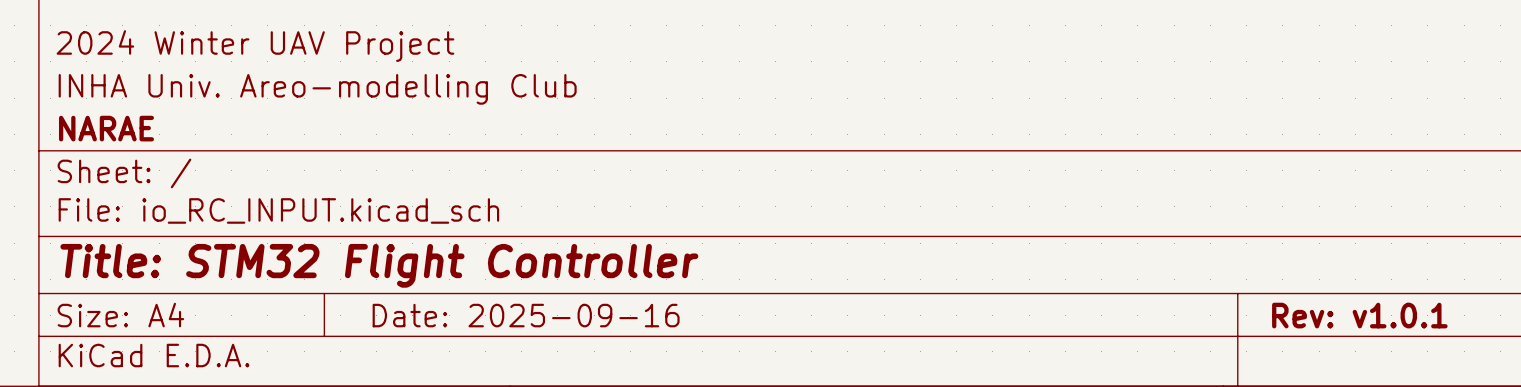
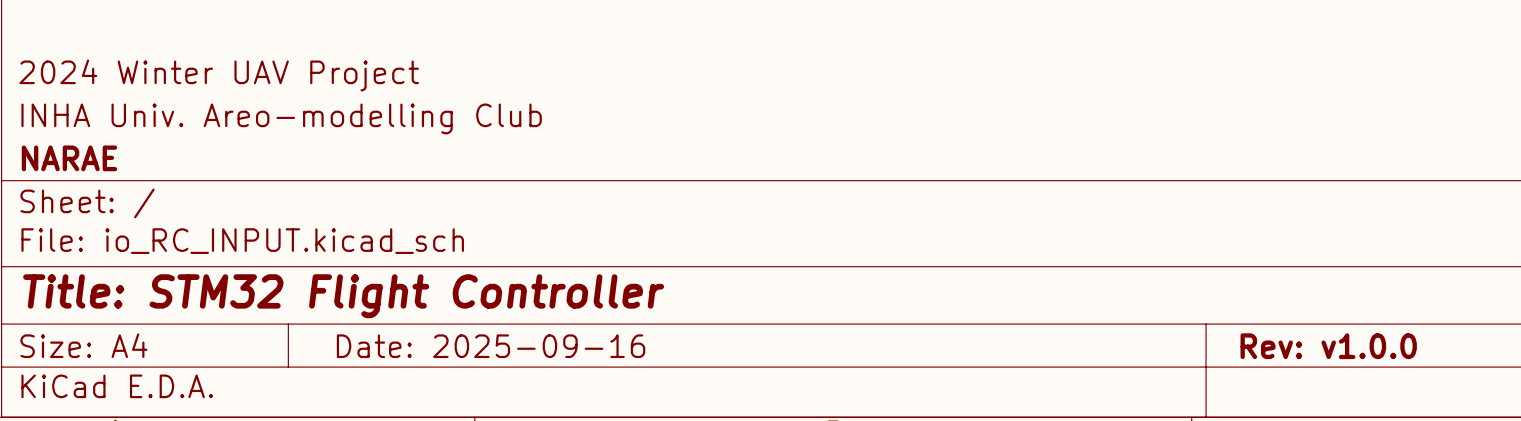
title block: Rev: v1.0.1 (1359, 315) -> Rev: v1.0.0 (1328, 346)

